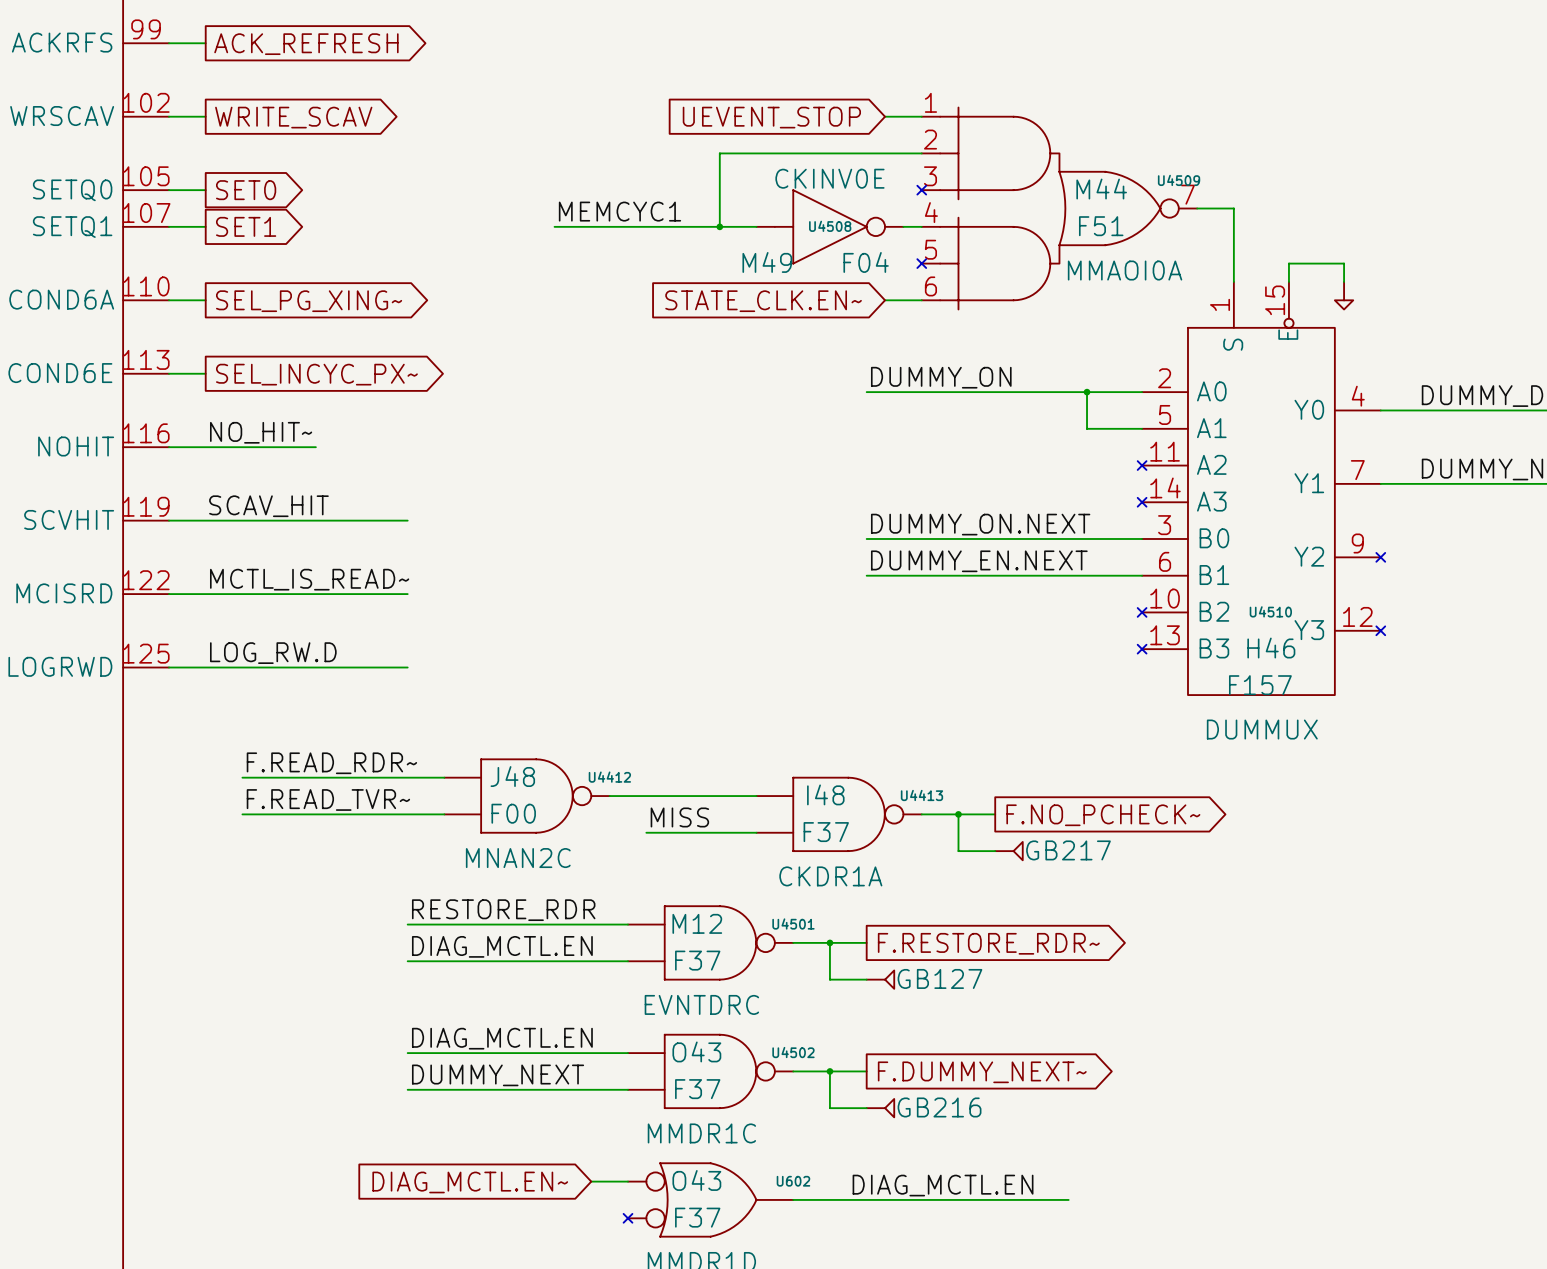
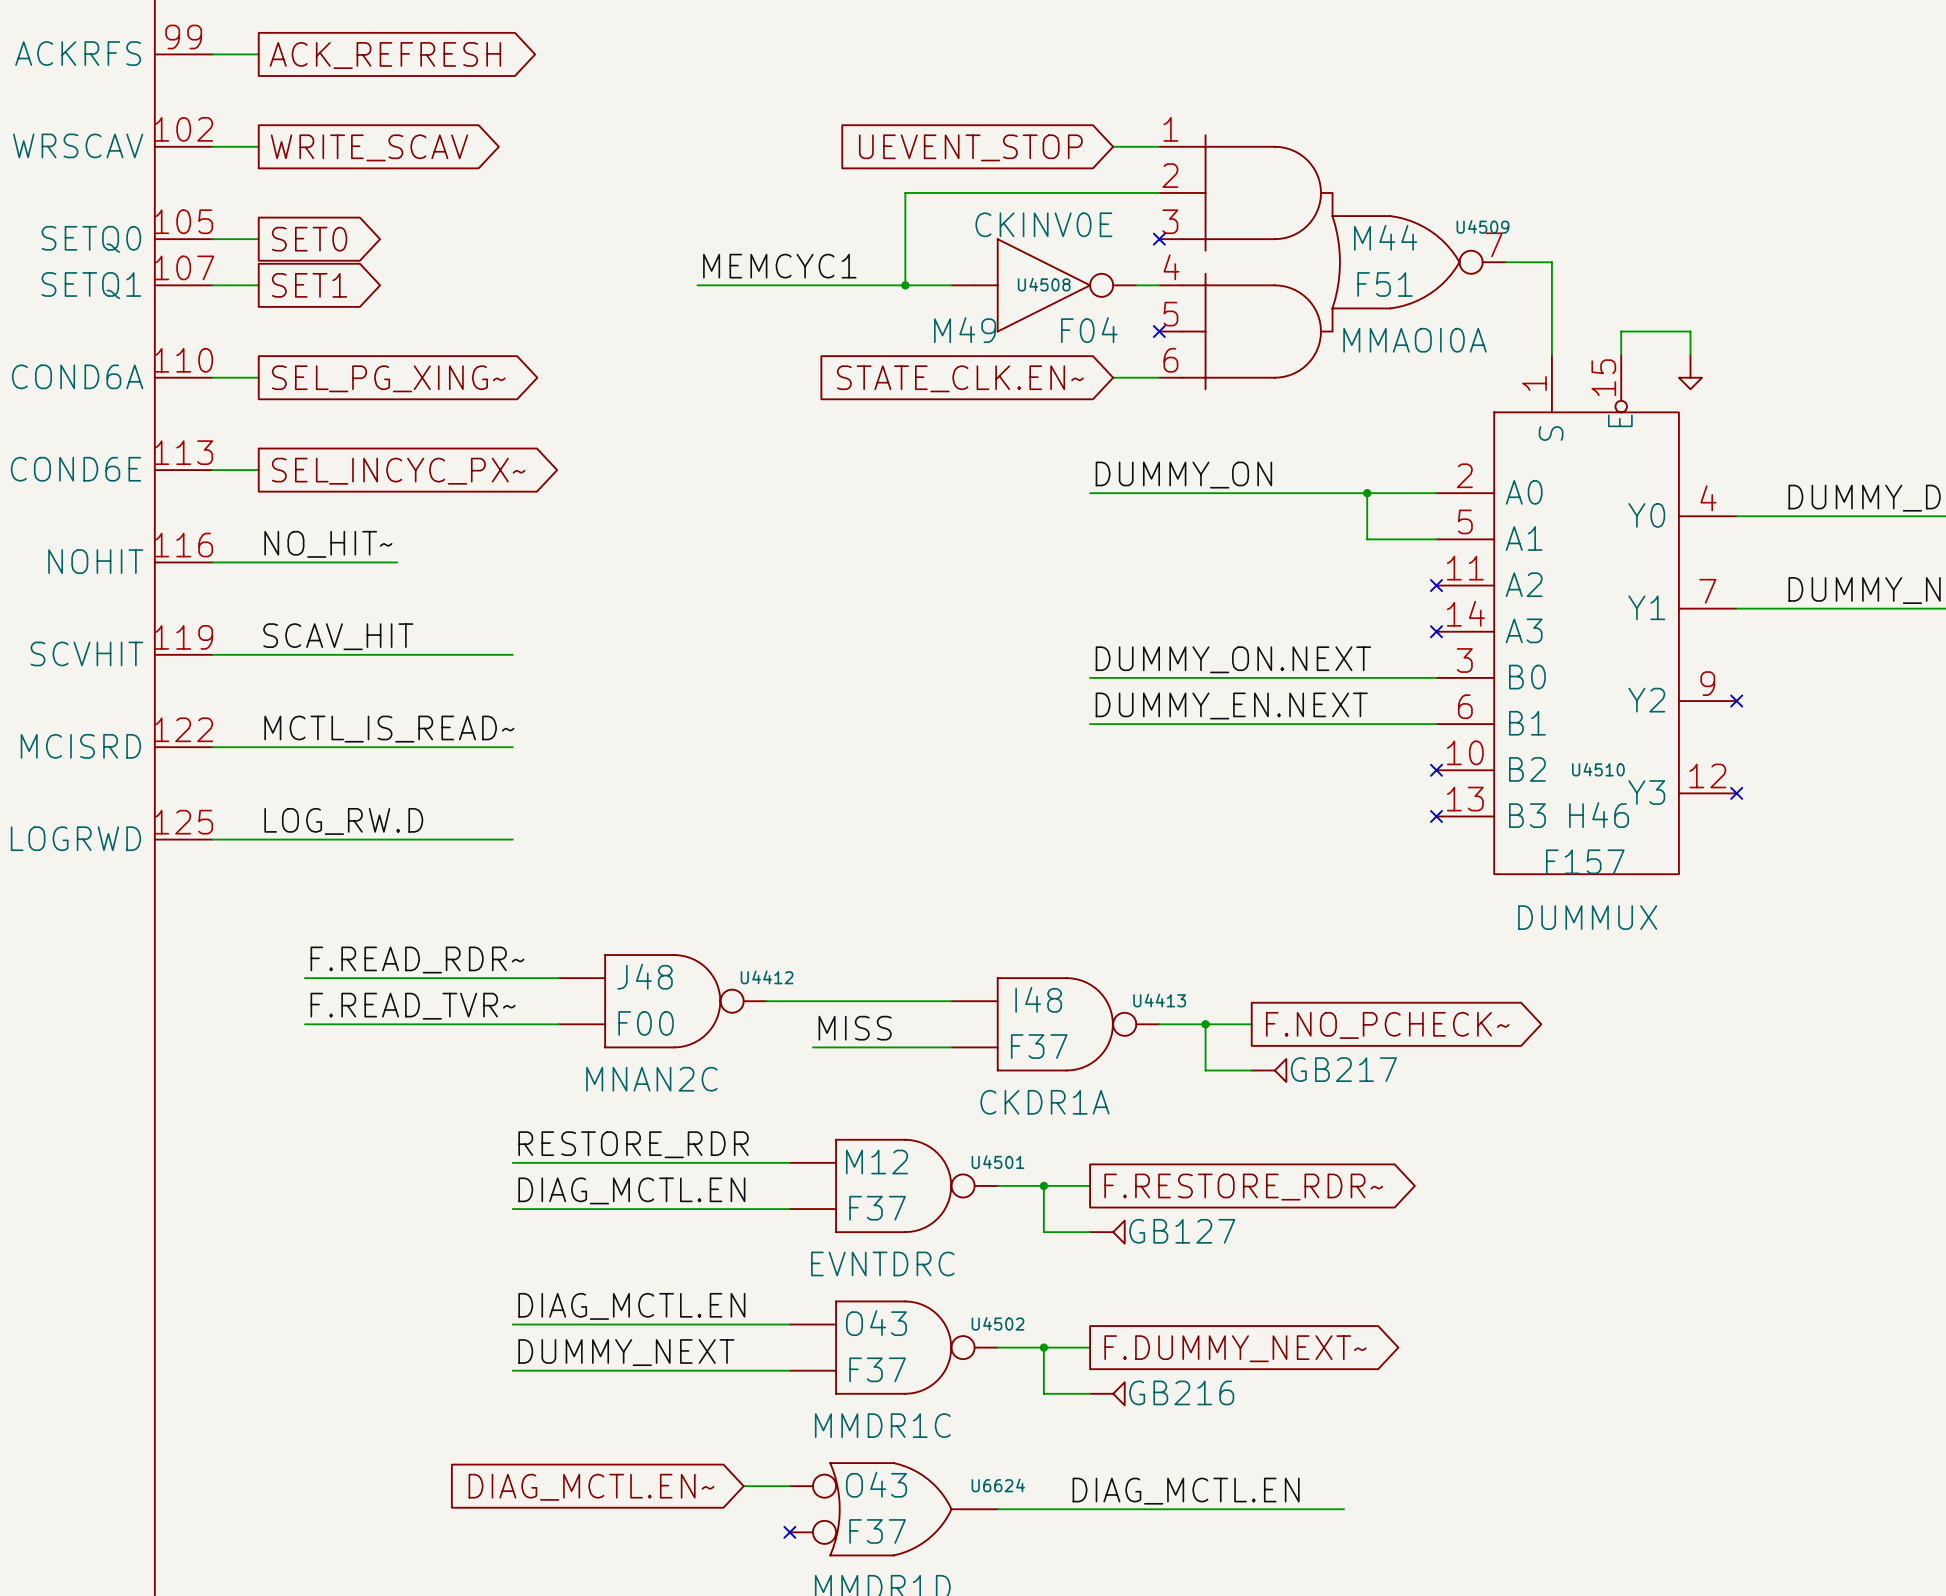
U602 name: U602 (793, 1181) -> U6624 (998, 1485)

